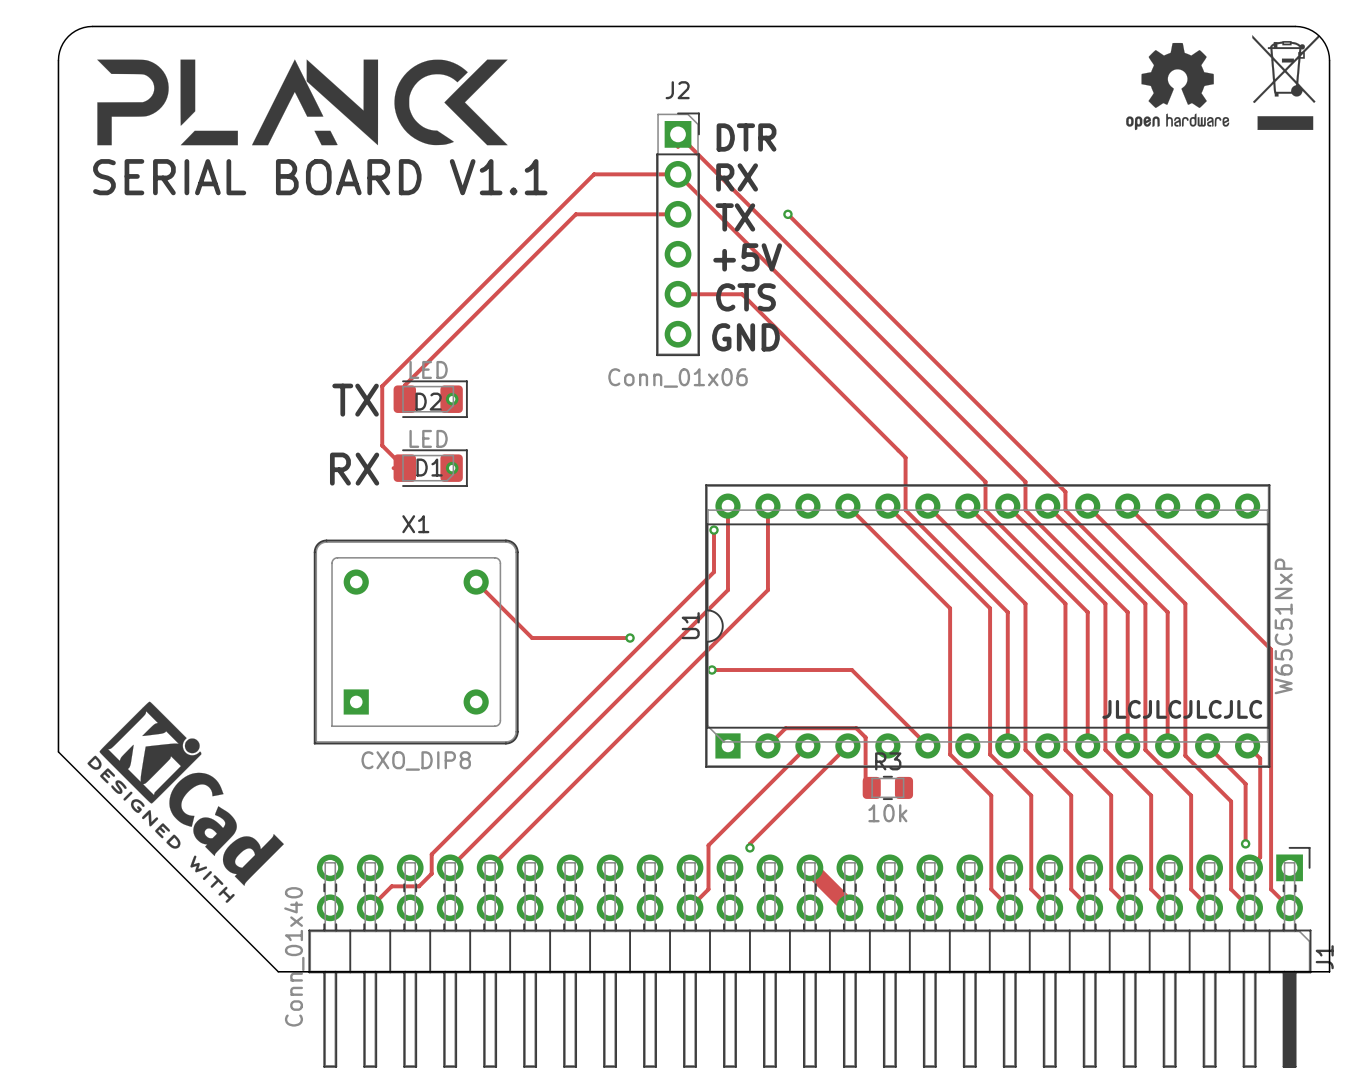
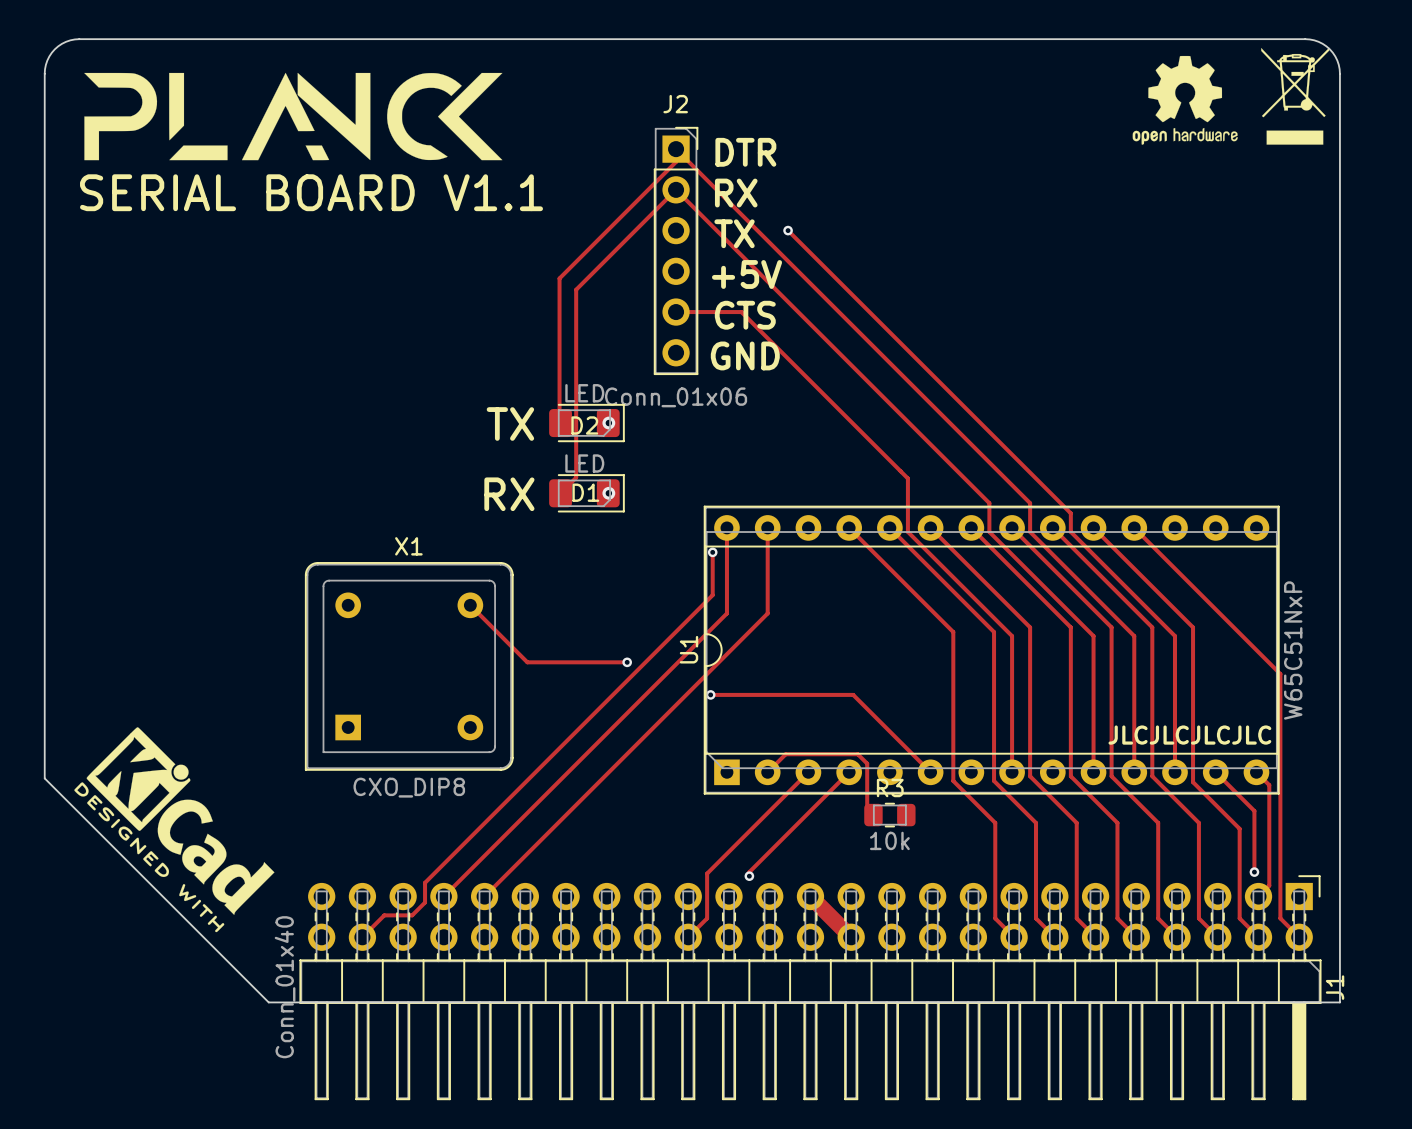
track: none -> (676, 161) (559, 278) (560, 423)
track: (678, 174) (594, 174) (382, 386) (382, 445) (404, 468) (393, 468) -> (676, 189) (576, 289) (576, 477) (560, 493)
track: (678, 214) (575, 214) (404, 385) (403, 398) -> none
D2 position: (430, 399) -> (586, 423)
via: (452, 399) -> none
text position: TX (355, 400) -> TX (510, 424)
via: none -> (608, 423)
D1 position: (430, 468) -> (586, 493)
via: (452, 468) -> none
text position: RX (354, 469) -> RX (509, 494)
via: none -> (608, 493)

